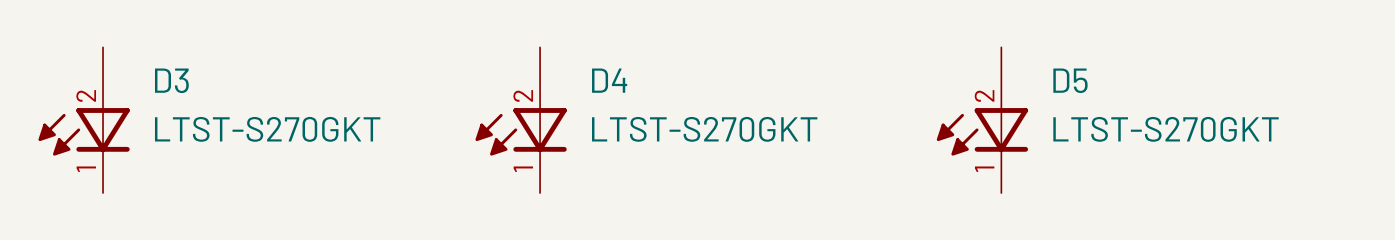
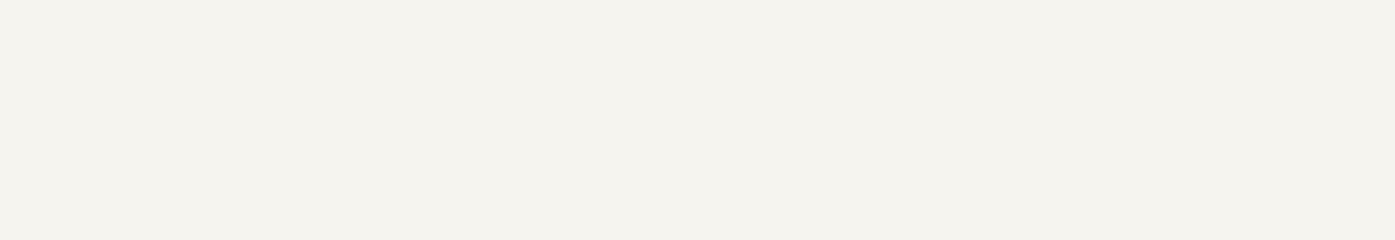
D3: LTST-S270GKT (84, 120) -> none
D4: LTST-S270GKT (521, 120) -> none
D5: LTST-S270GKT (982, 120) -> none

